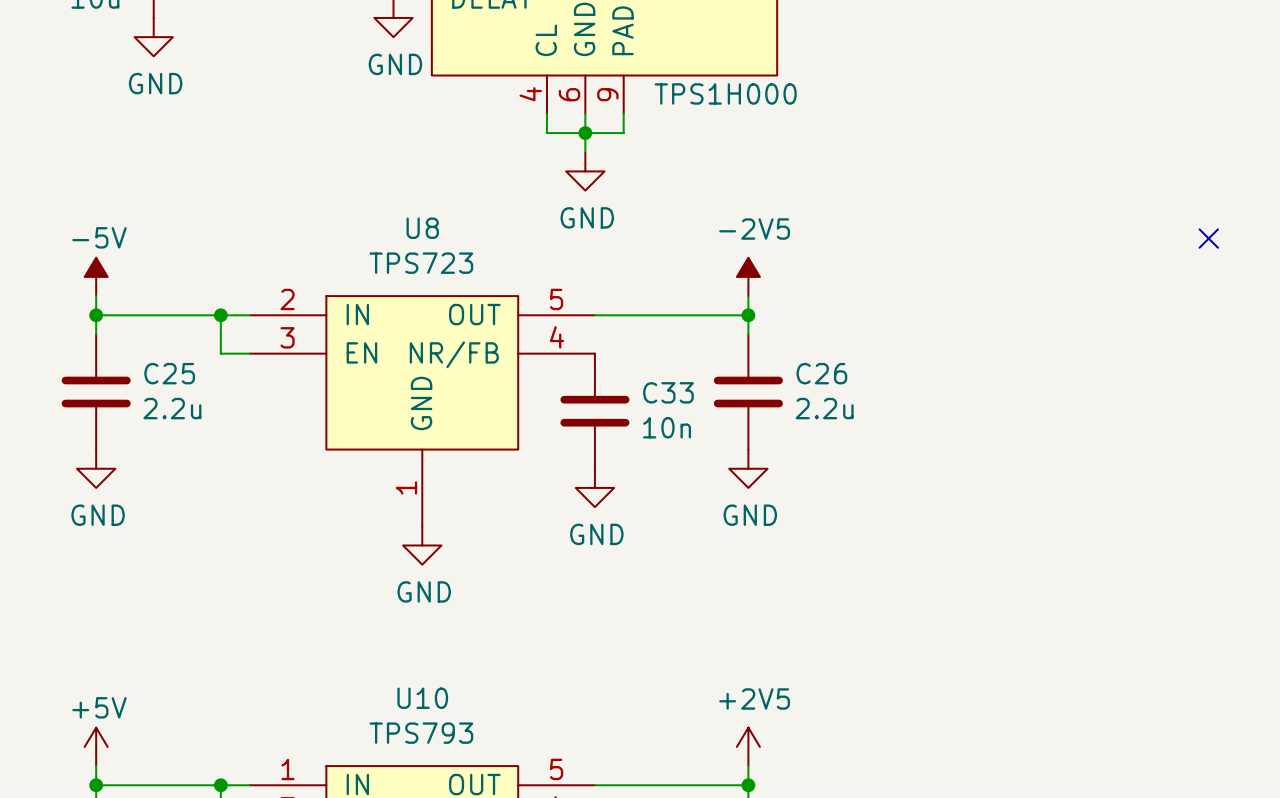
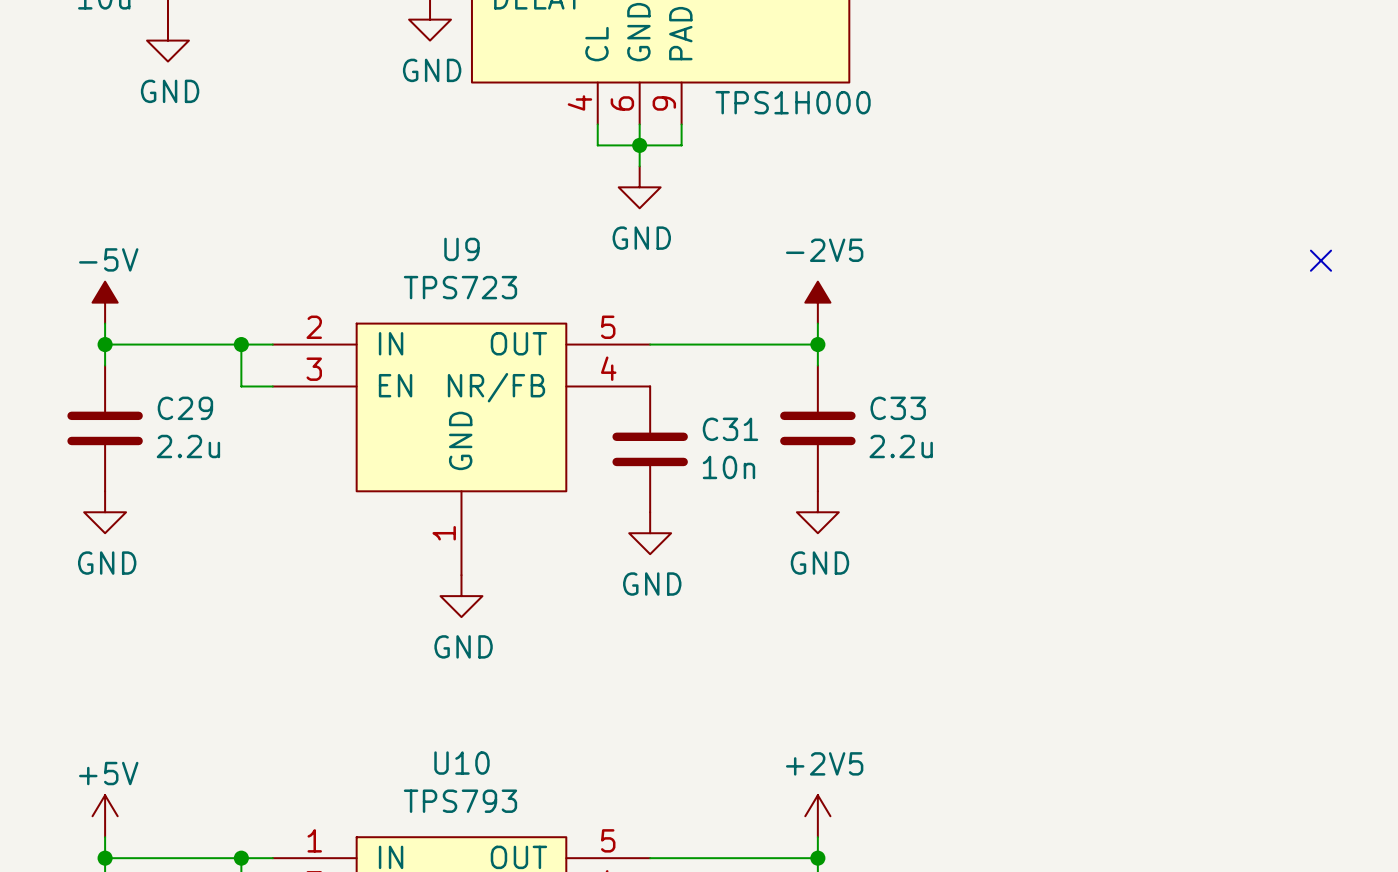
U8 name: U8 (422, 228) -> U9 (461, 249)
C25 name: C25 (169, 373) -> C29 (185, 408)
C26 name: C26 (821, 373) -> C33 (898, 408)
C33 name: C33 (668, 392) -> C31 (730, 429)

